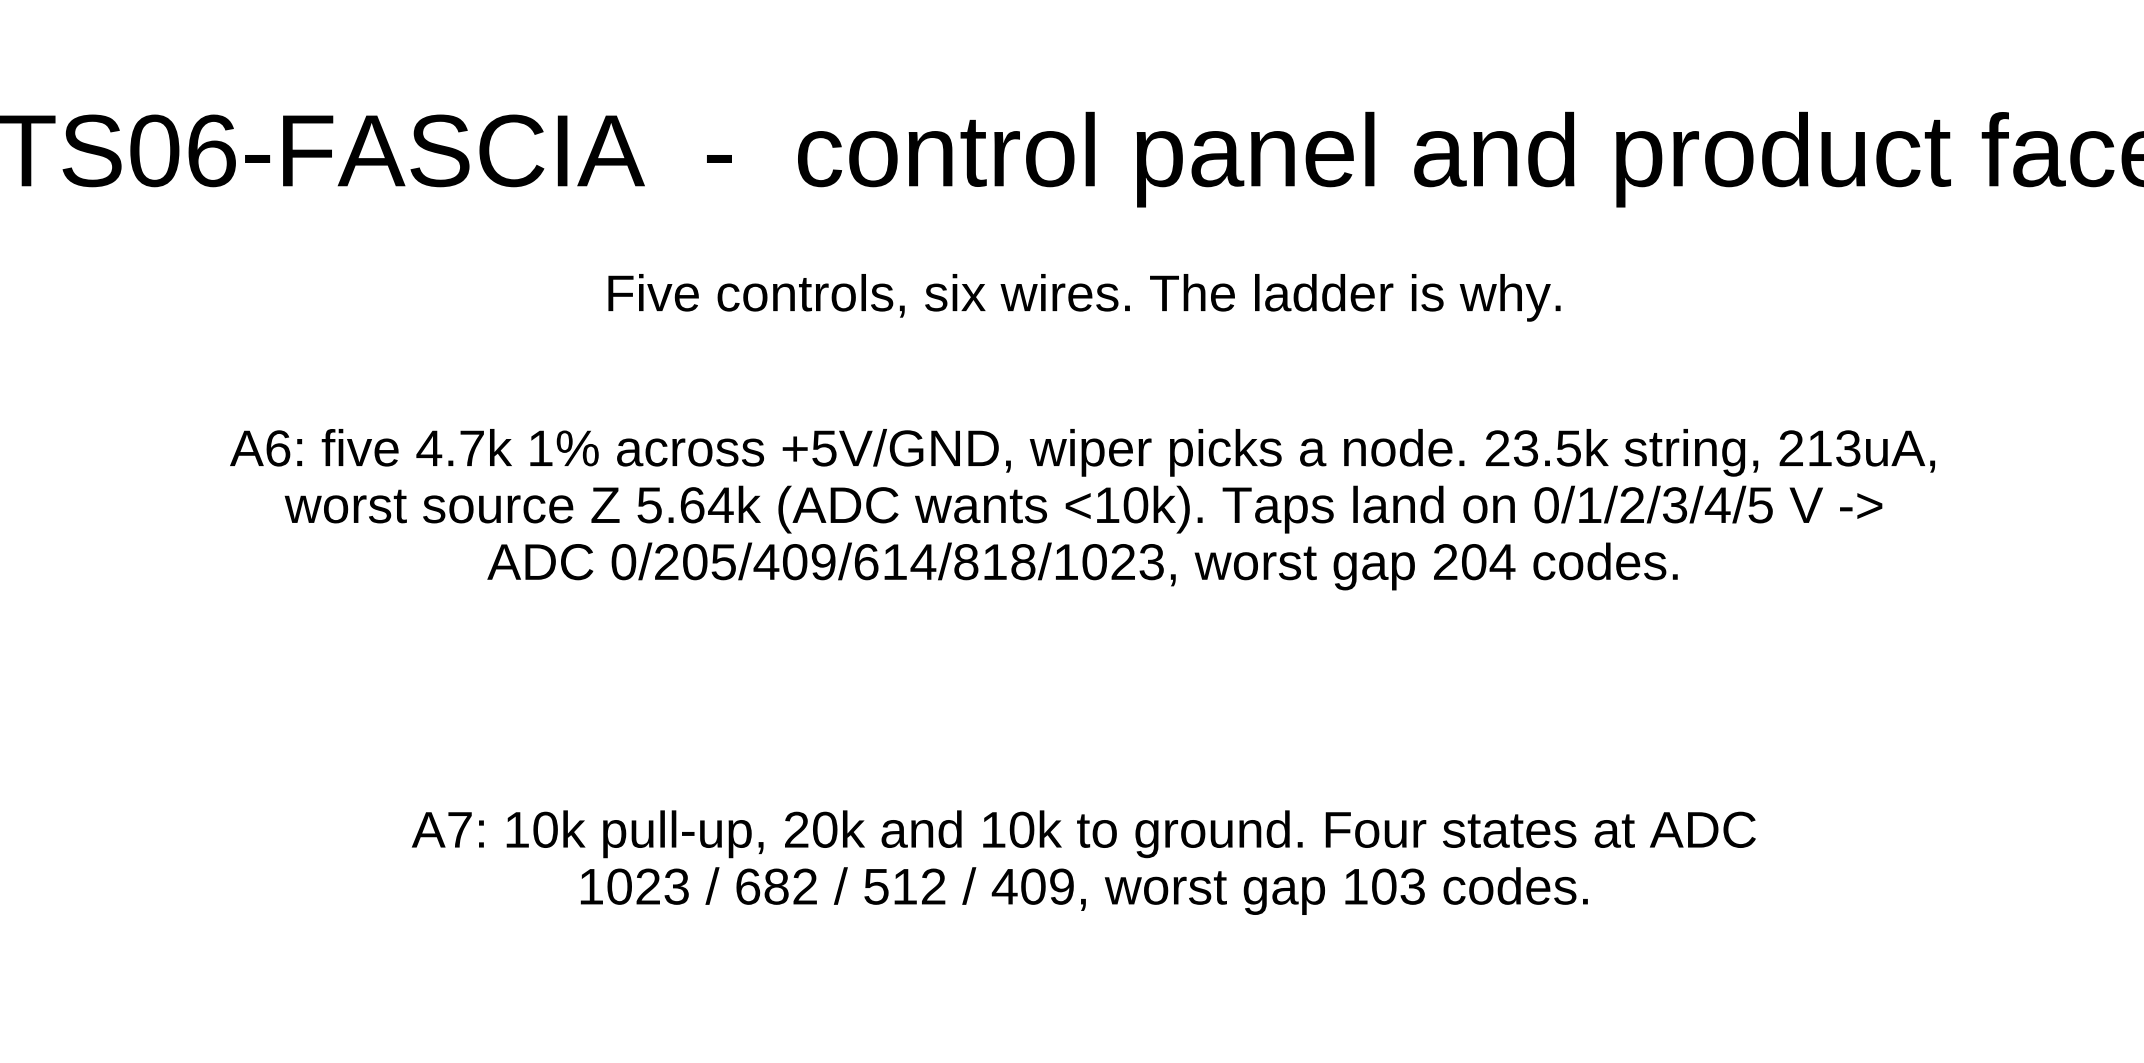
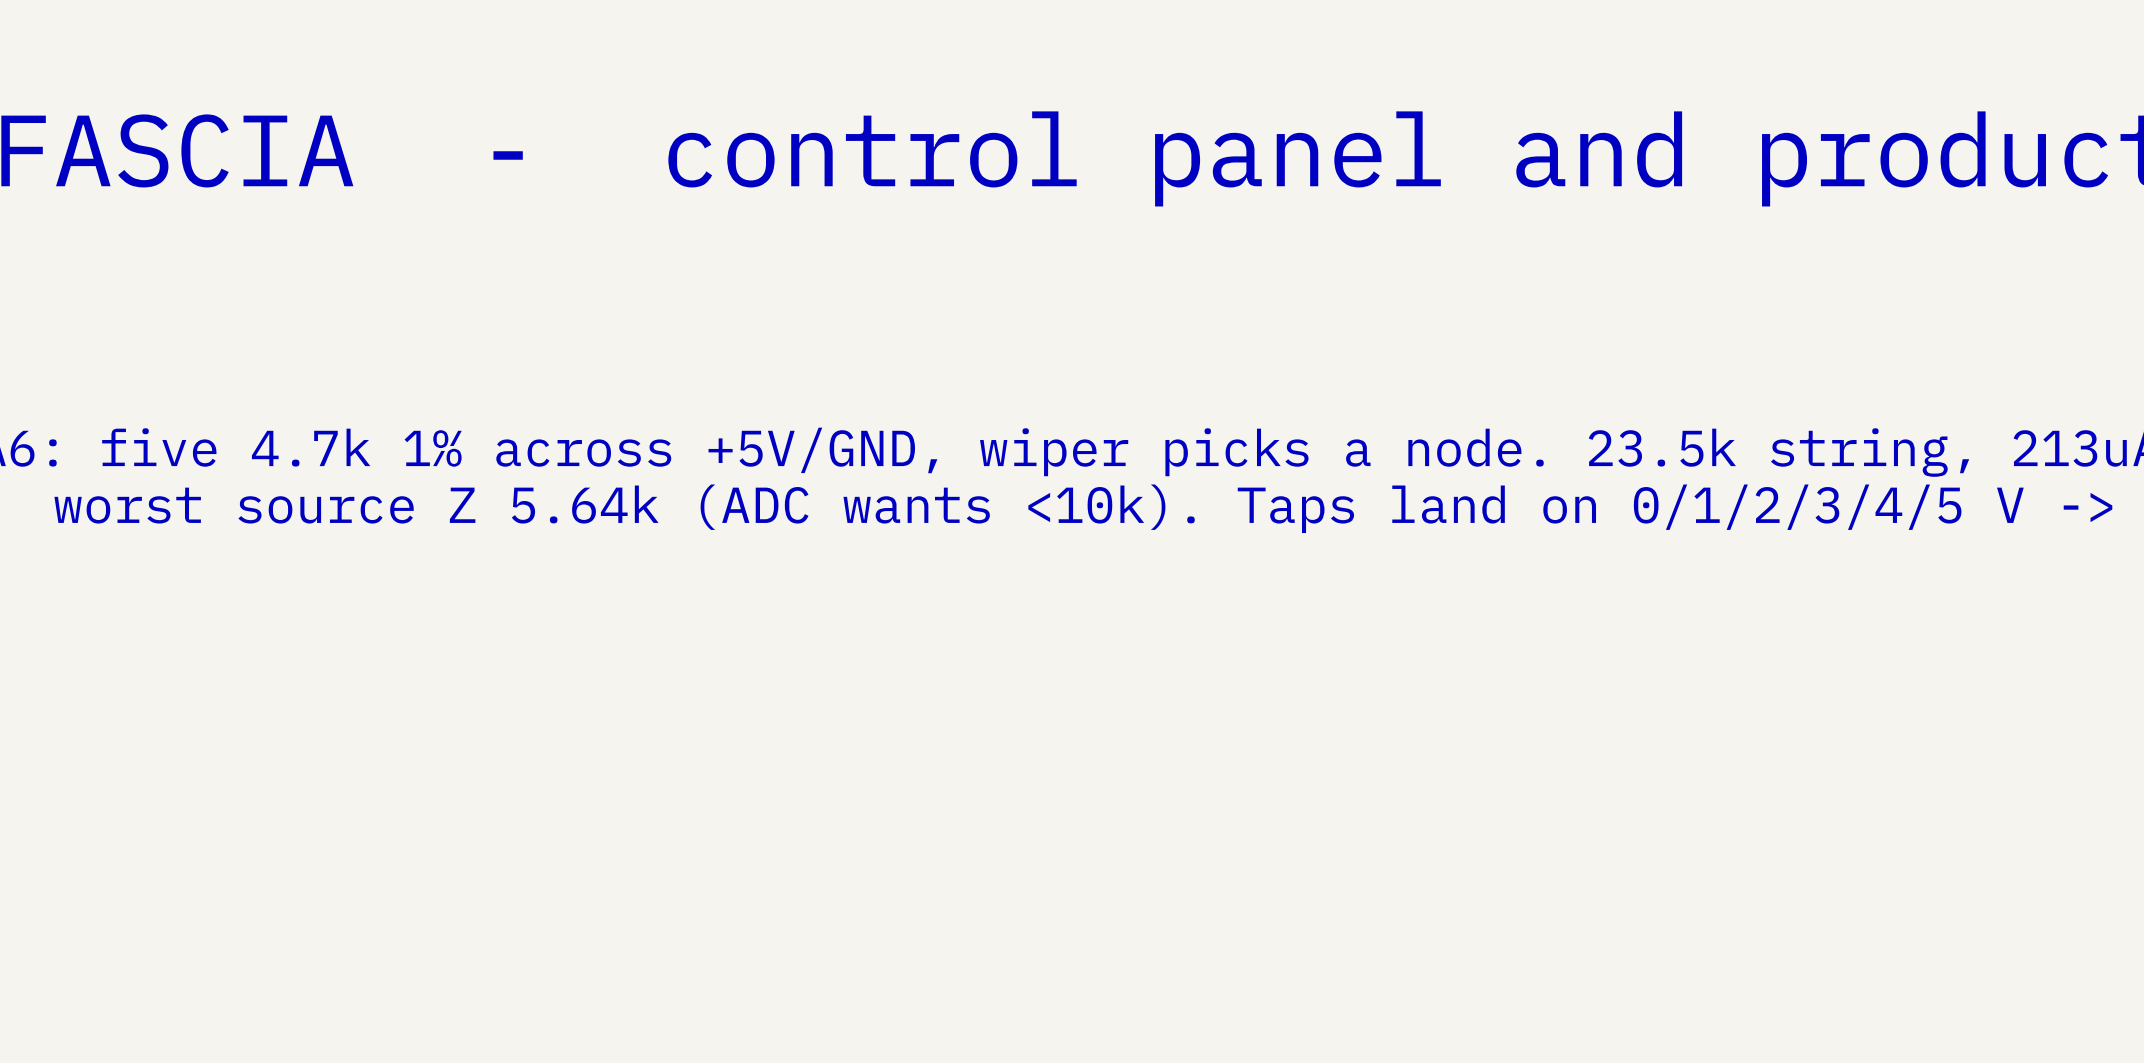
text: Five controls, six wires. The ladder is why. (1084, 297) -> none
text: ADC 0/205/409/614/818/1023, worst gap 204 codes. (1082, 566) -> none
text: A7: 10k pull-up, 20k and 10k to ground. Four states at ADC (1083, 834) -> none
text: 1023 / 682 / 512 / 409, worst gap 103 codes. (1084, 891) -> none

